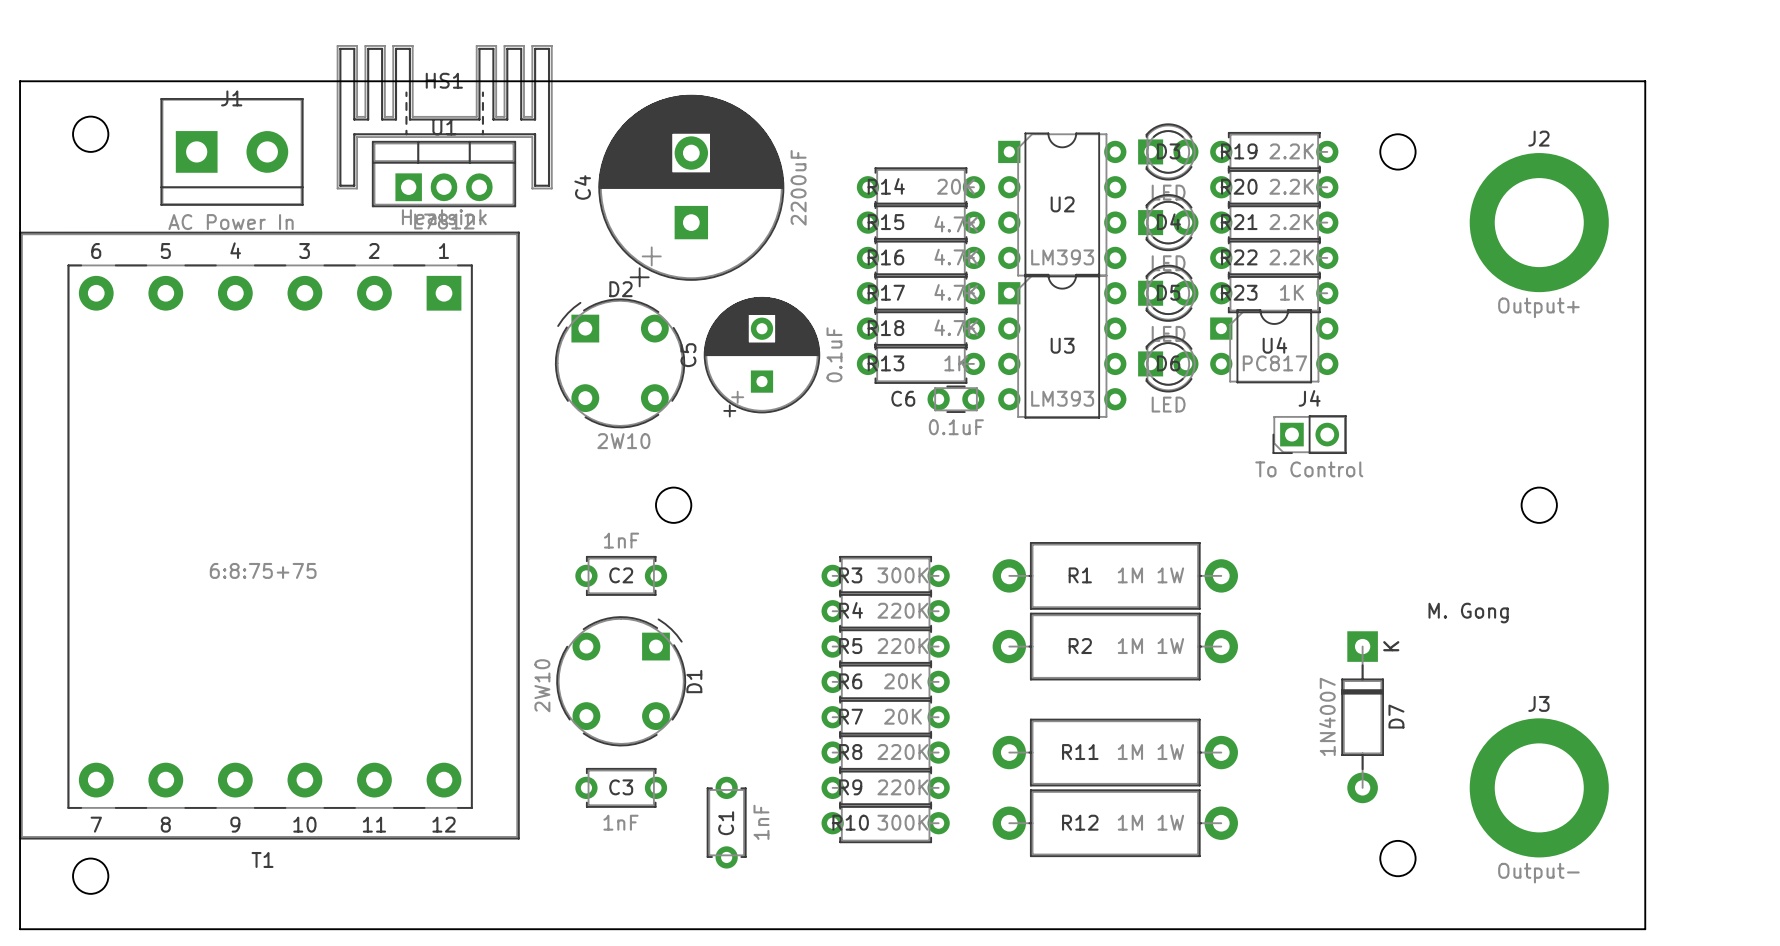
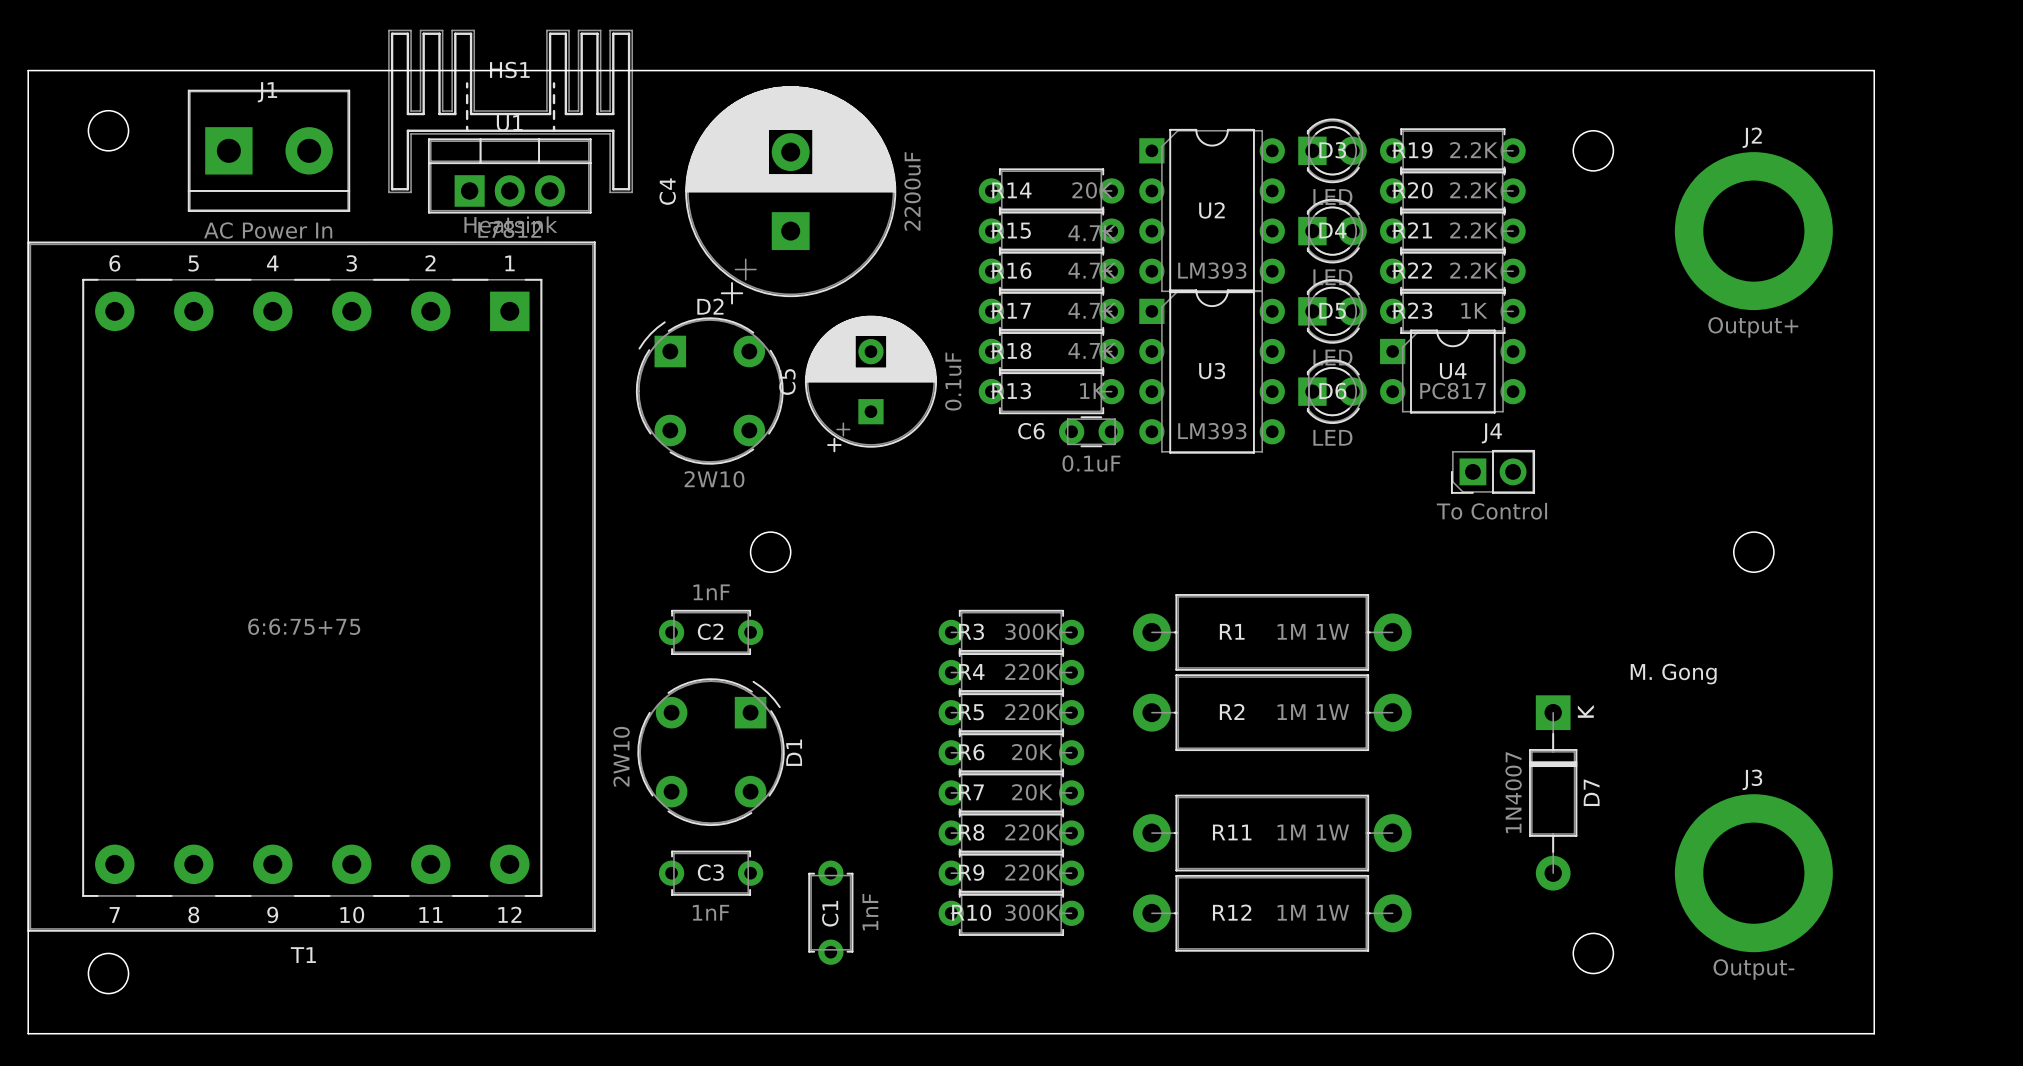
T1 value: 6:8:75+75 (263, 570) -> 6:6:75+75 (304, 626)

